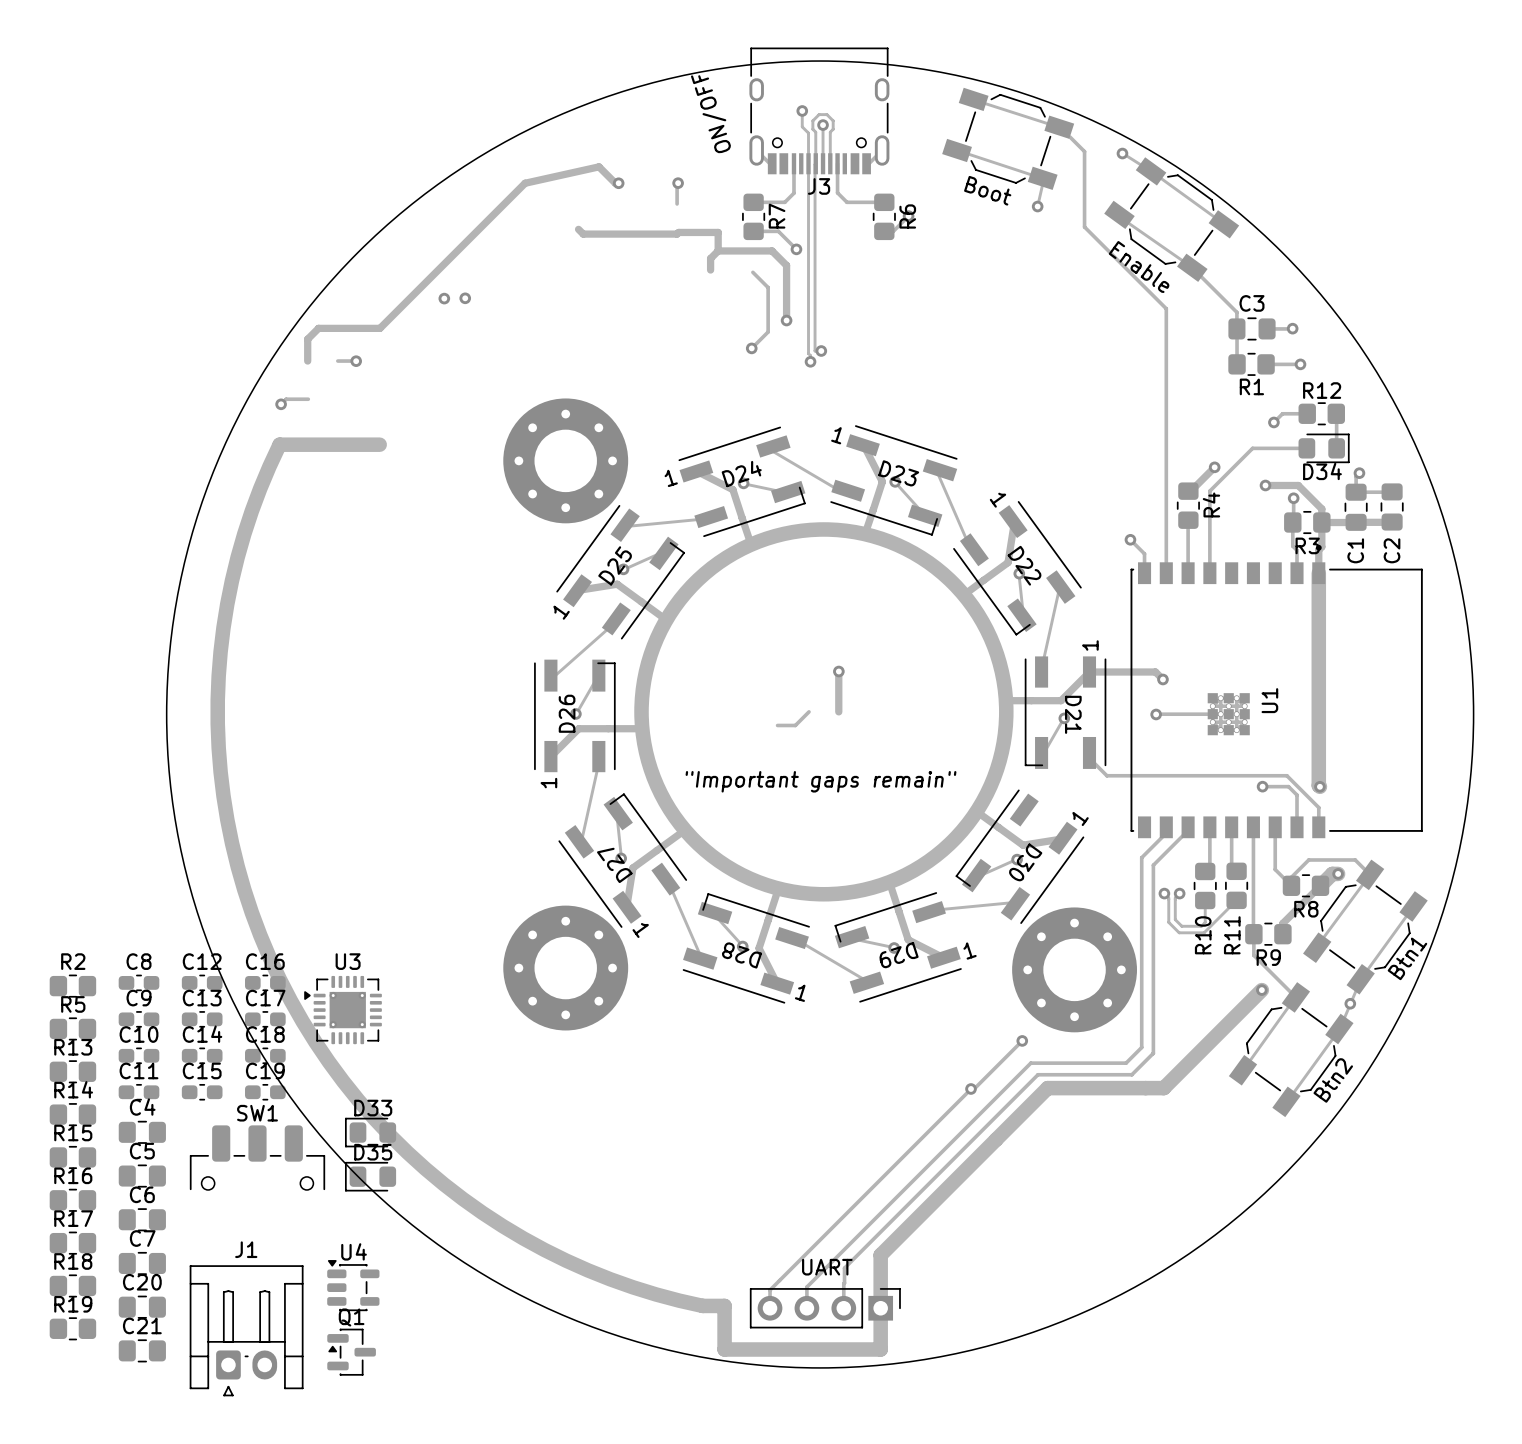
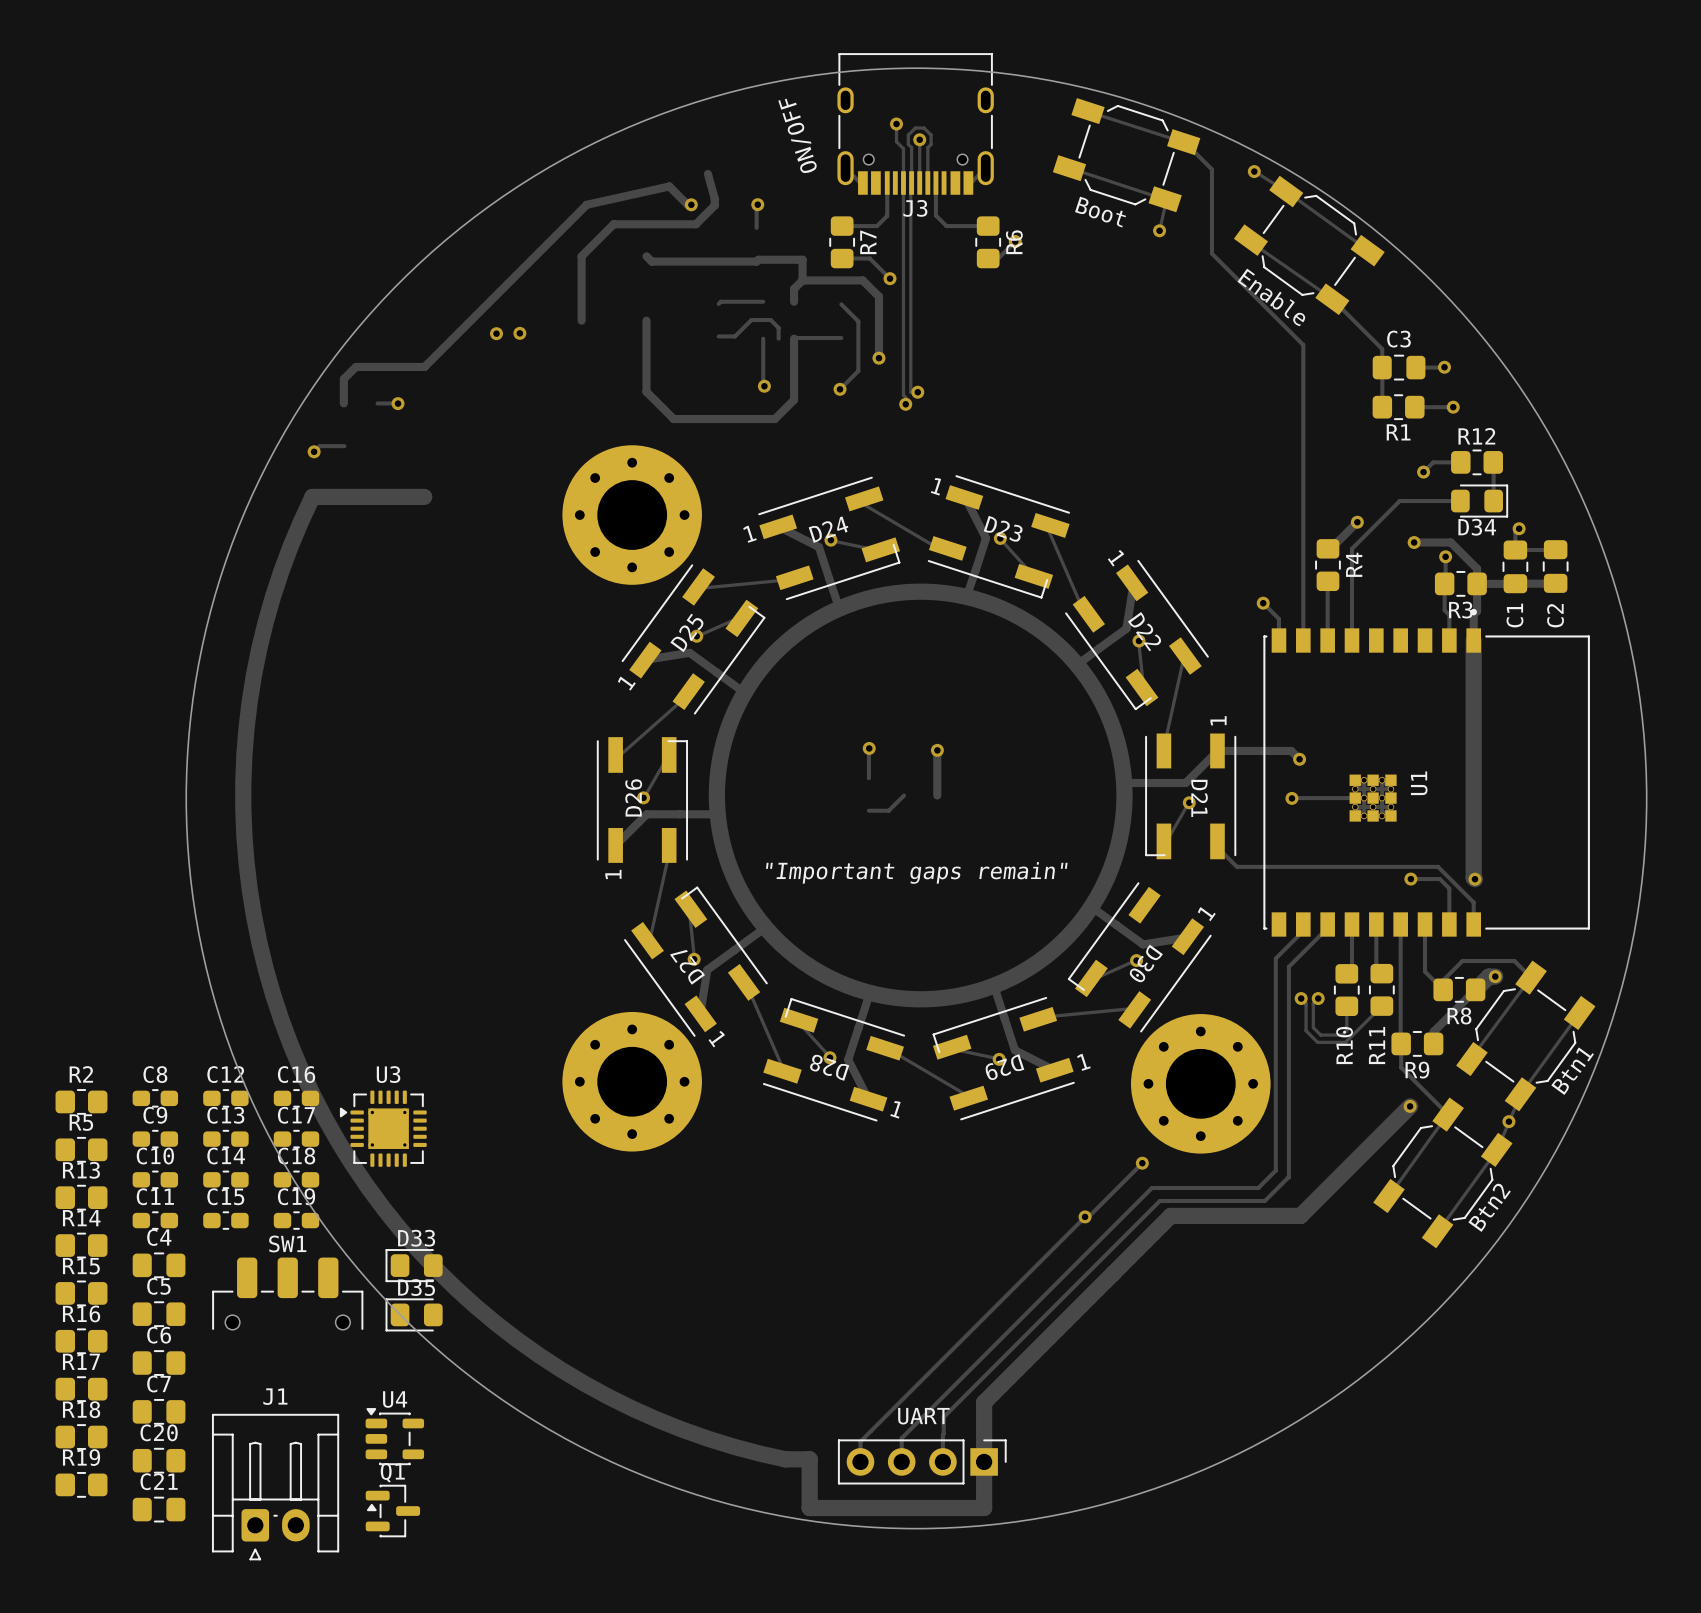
track: none -> (707, 173) (714, 205) (695, 224) (613, 224) (581, 256) (581, 320)
track: none -> (763, 301) (720, 301) (718, 303)
track: none -> (646, 320) (646, 391) (673, 419) (774, 419) (794, 399) (794, 338) (841, 338)
track: none -> (718, 336) (735, 336) (751, 320) (770, 320) (778, 327) (778, 338)
track: none -> (763, 338) (764, 386)
via: none -> (764, 386)
track: none -> (869, 748) (868, 778)
via: none -> (869, 748)

